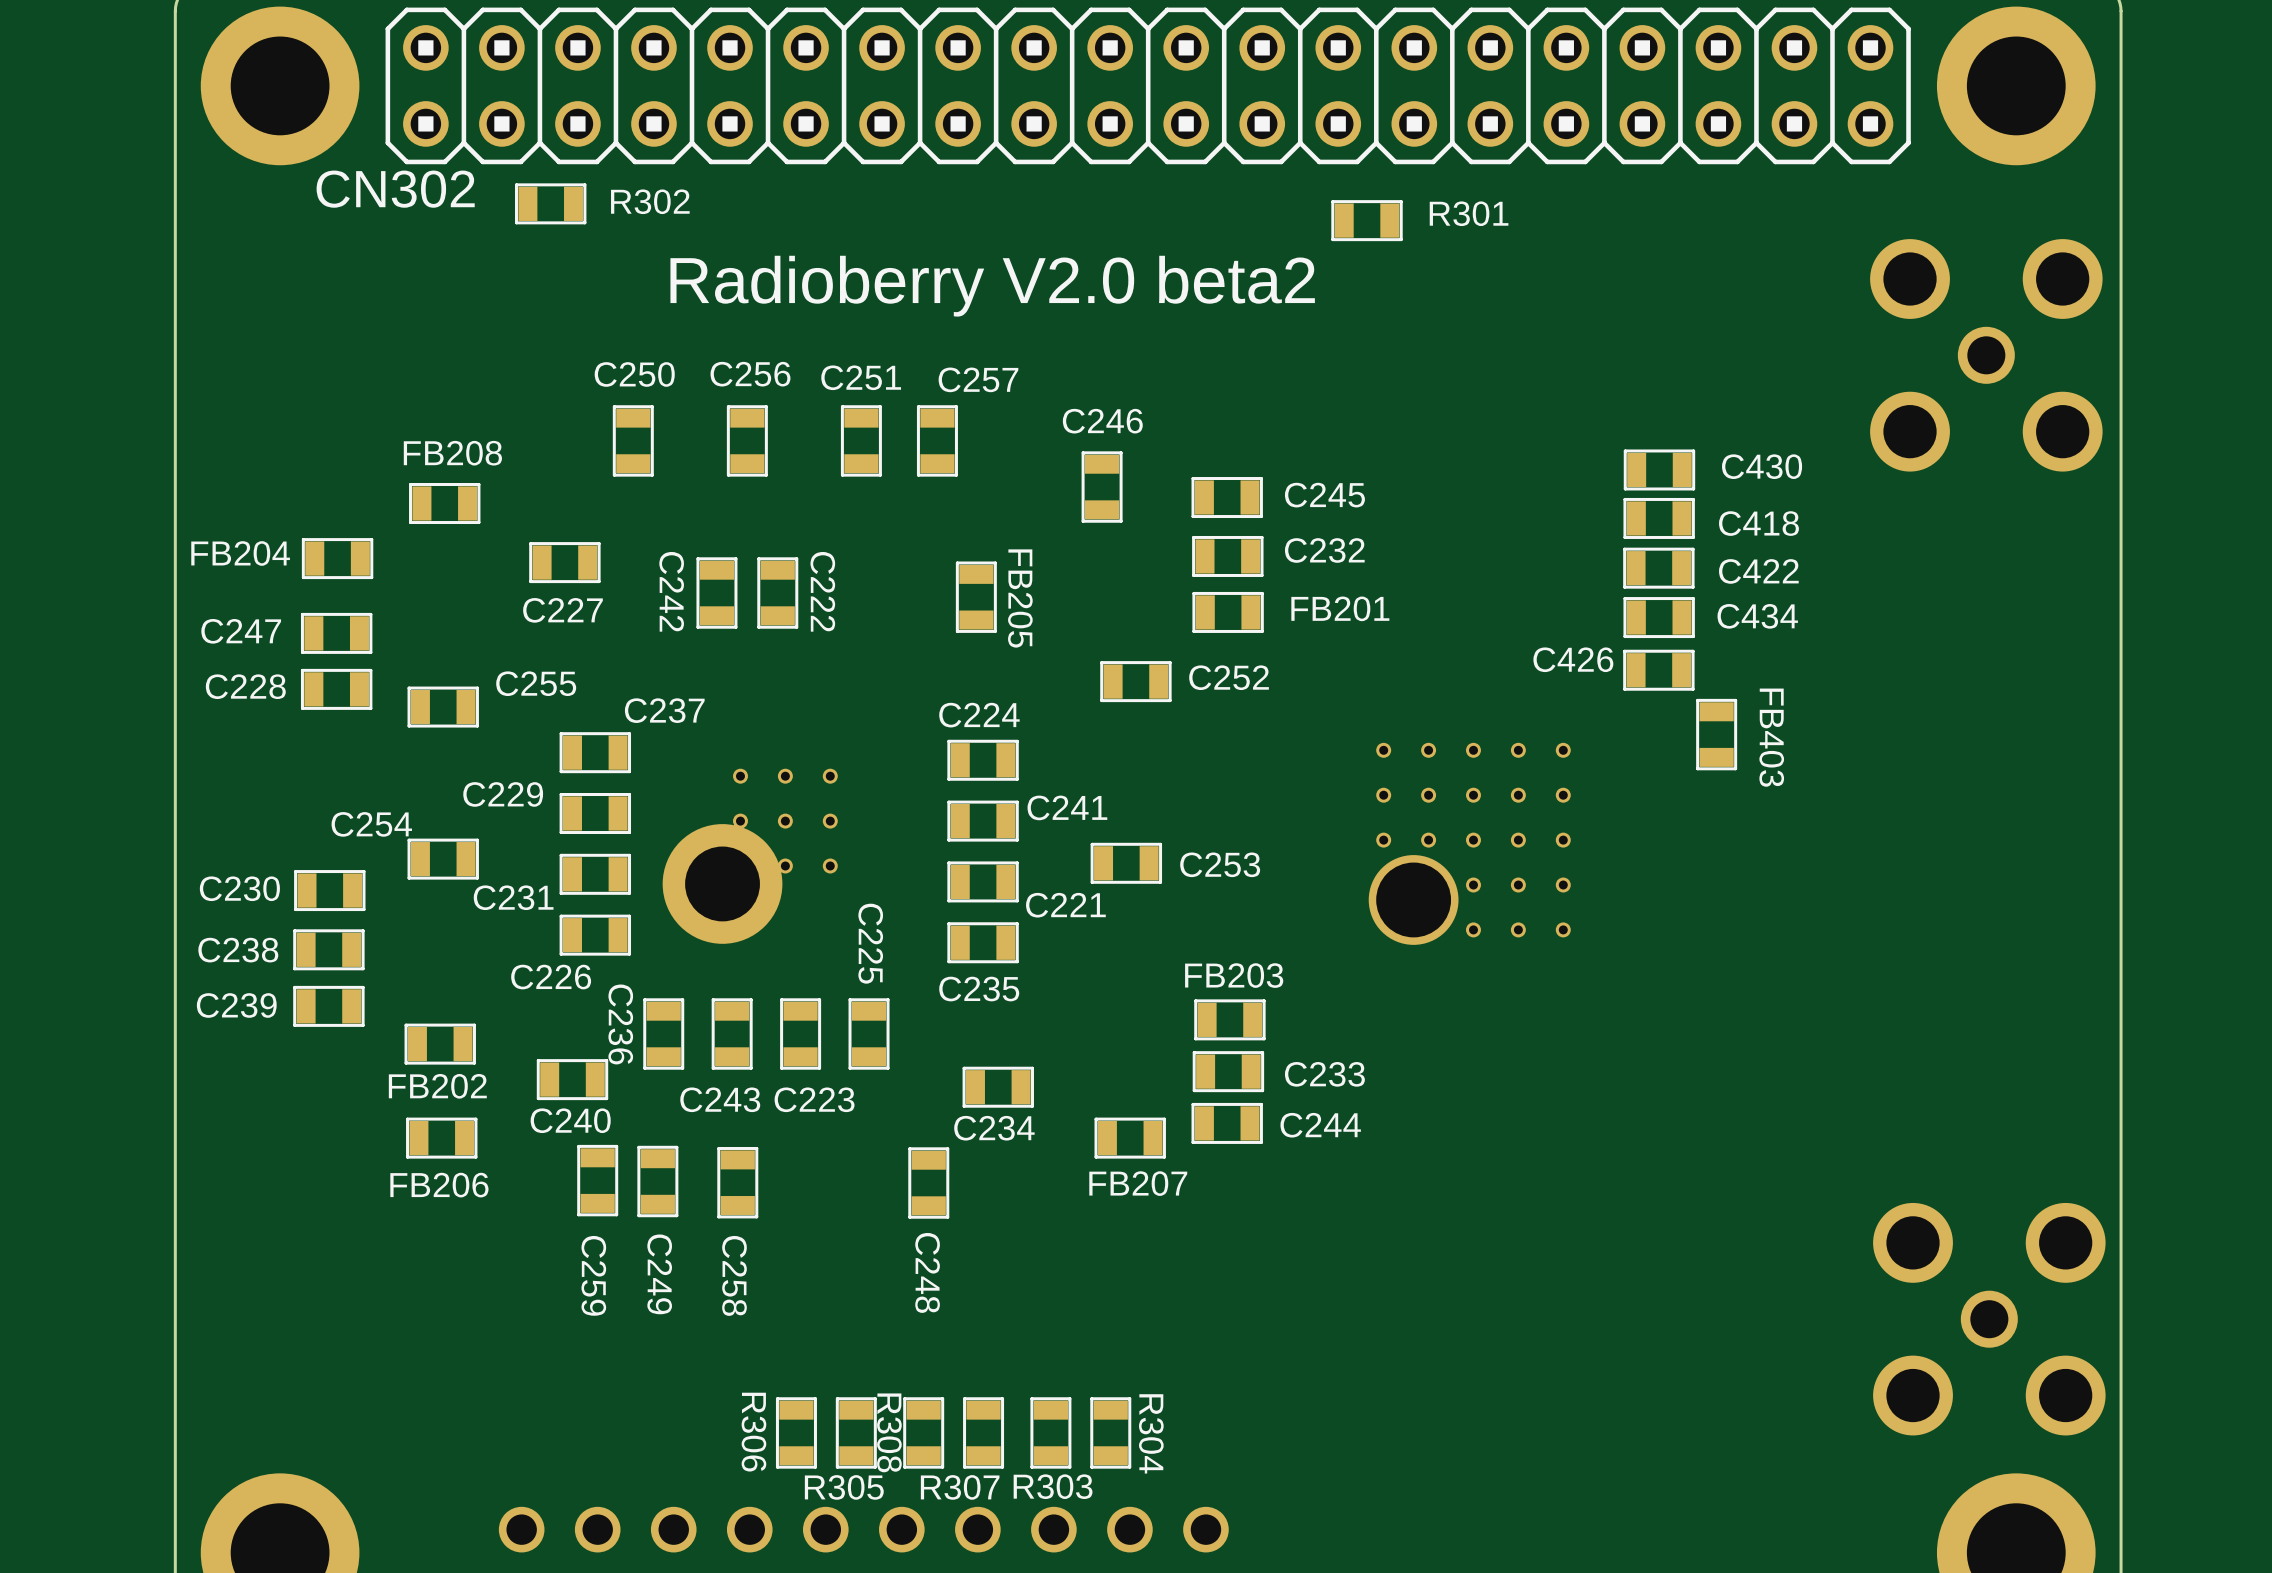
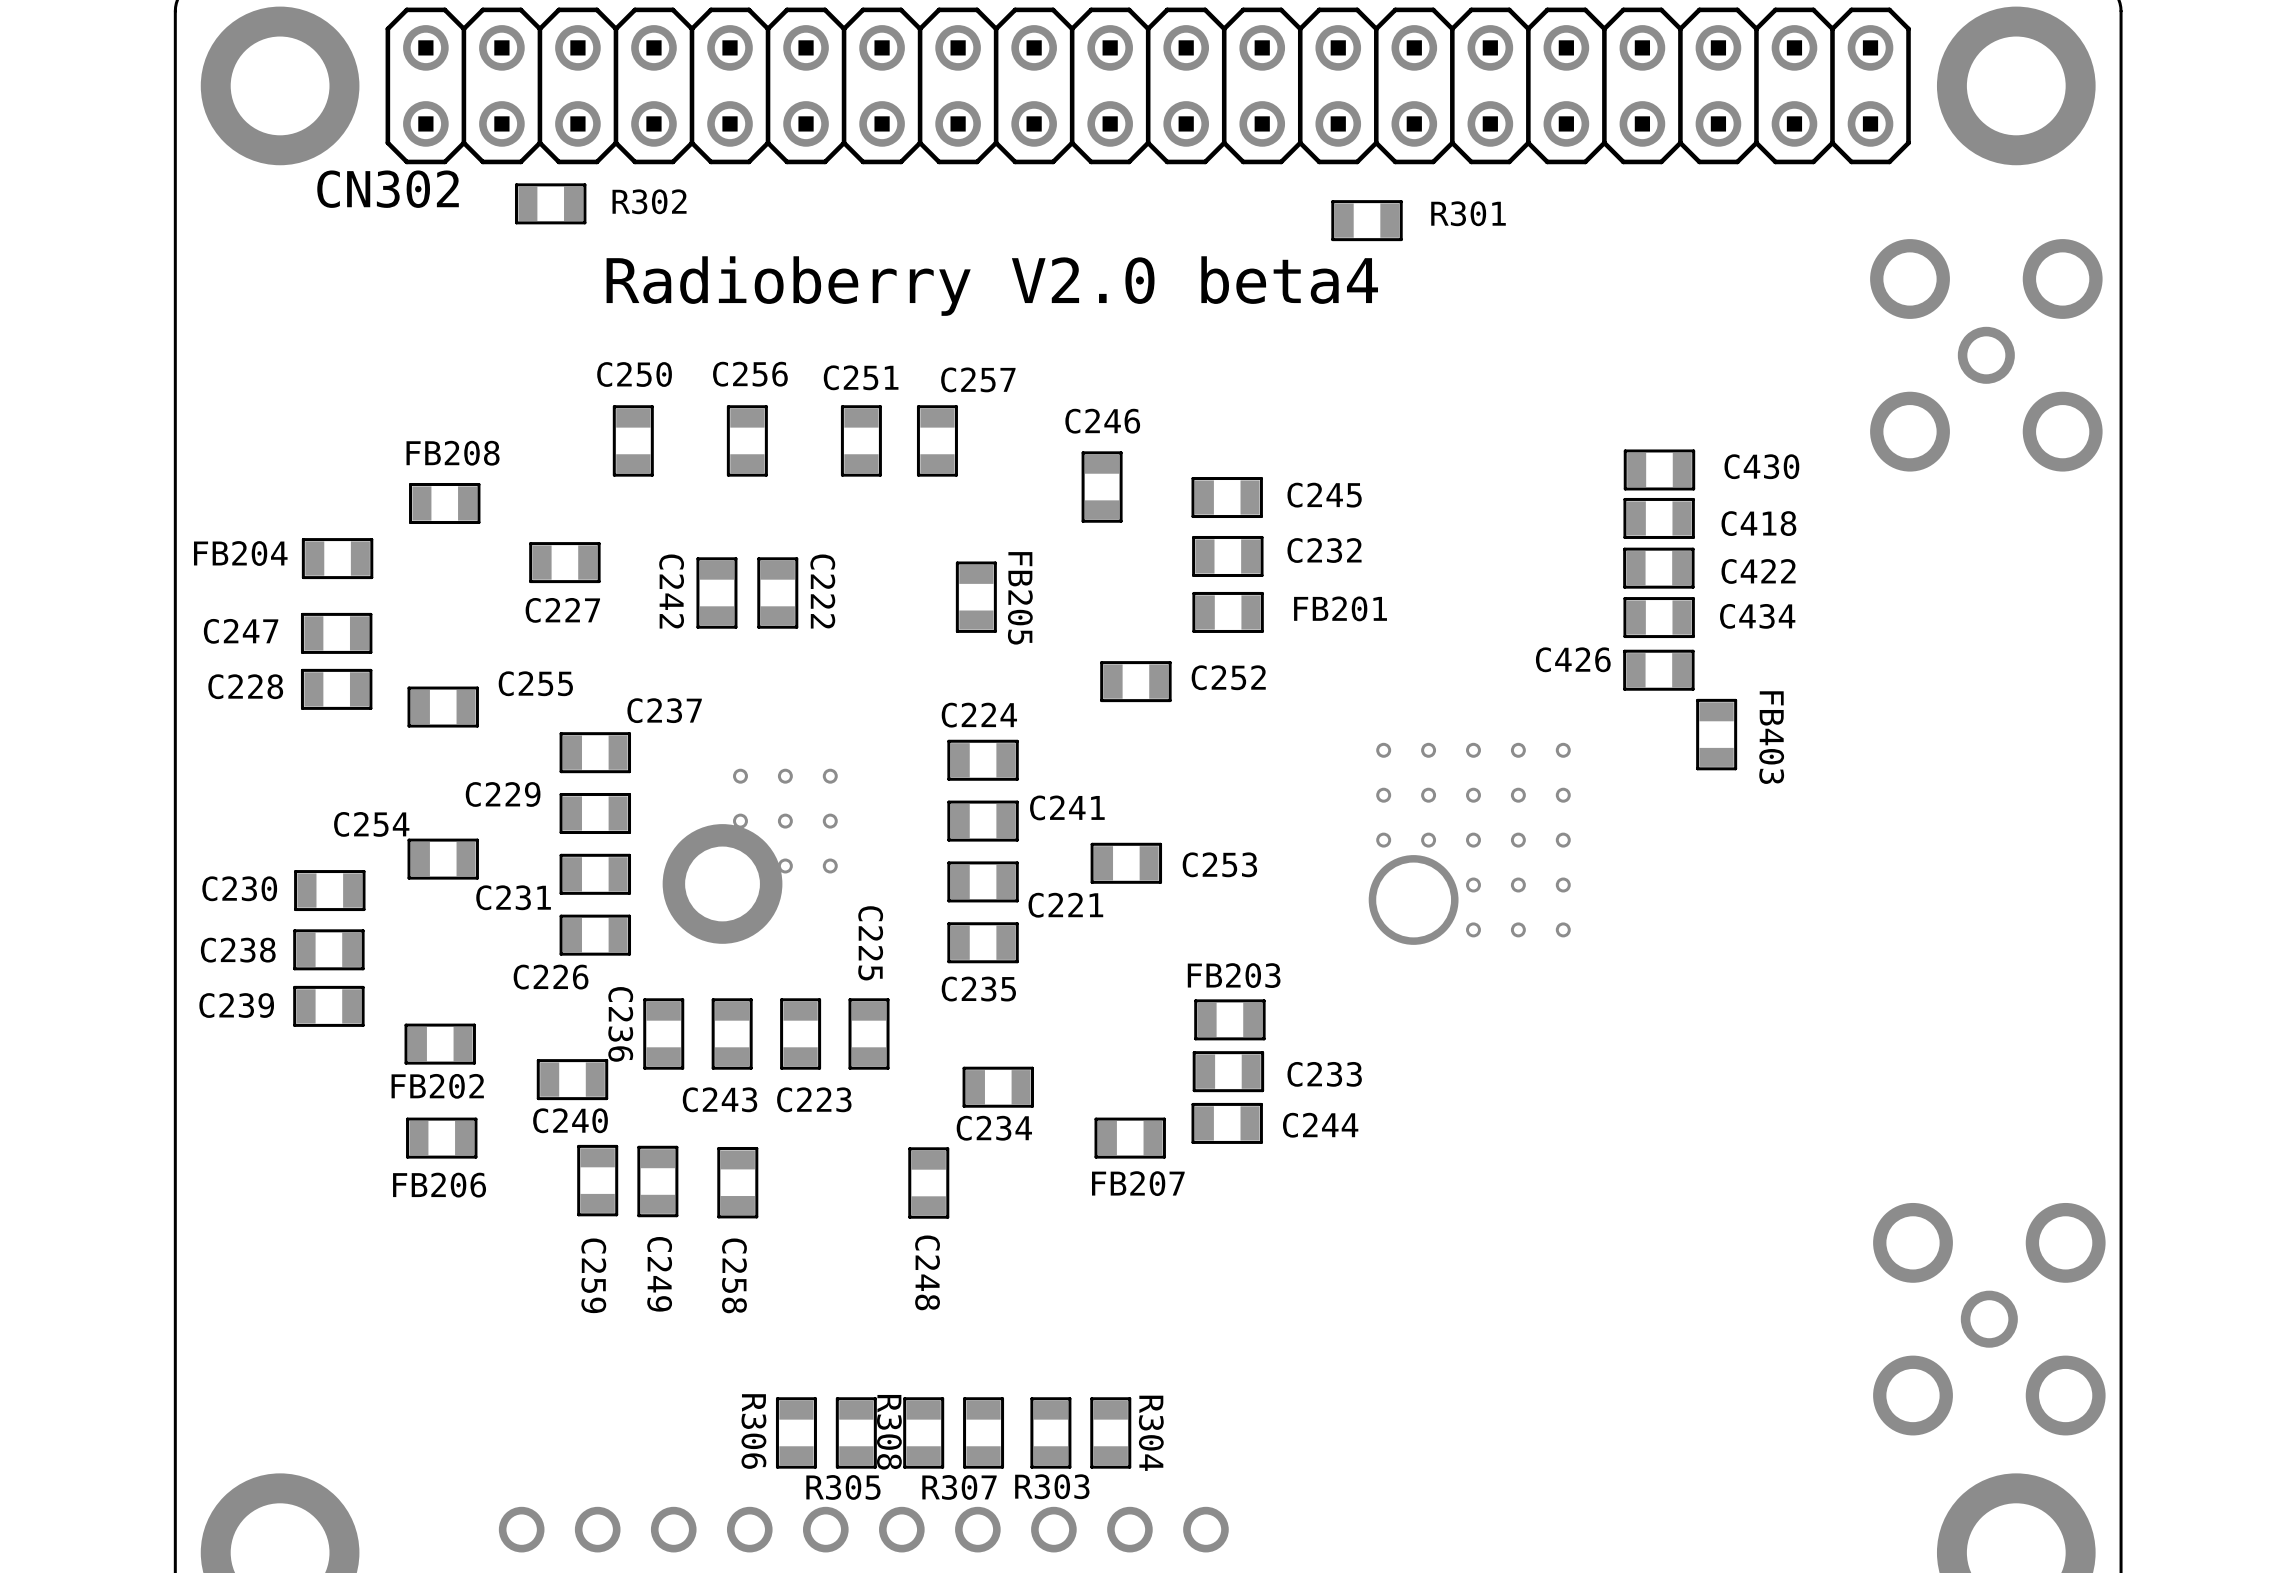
text: Radioberry V2.0 beta2 (992, 286) -> Radioberry V2.0 beta4 (992, 286)

